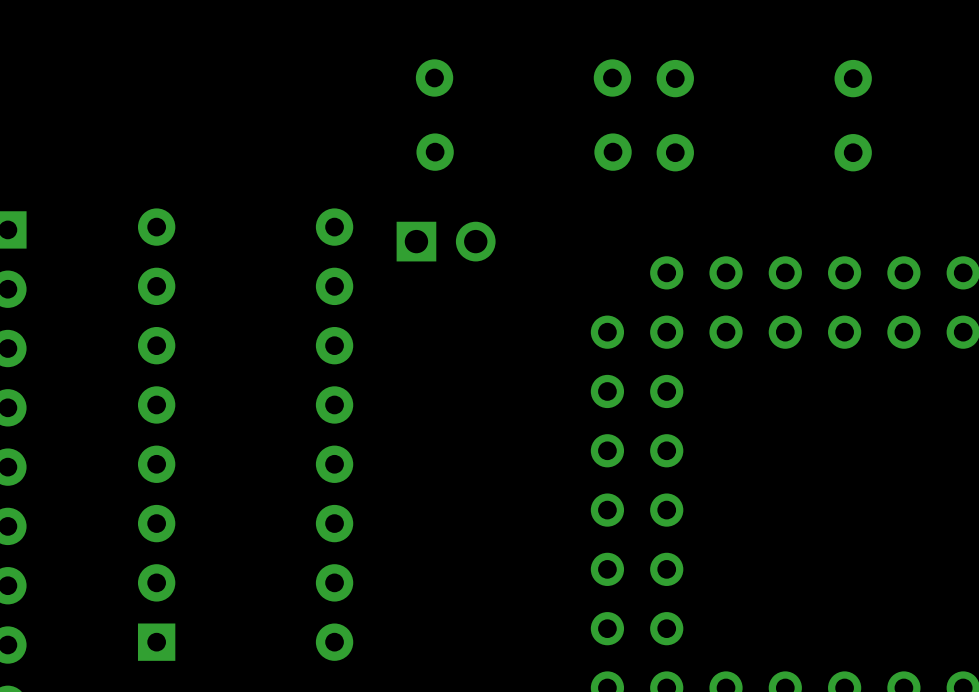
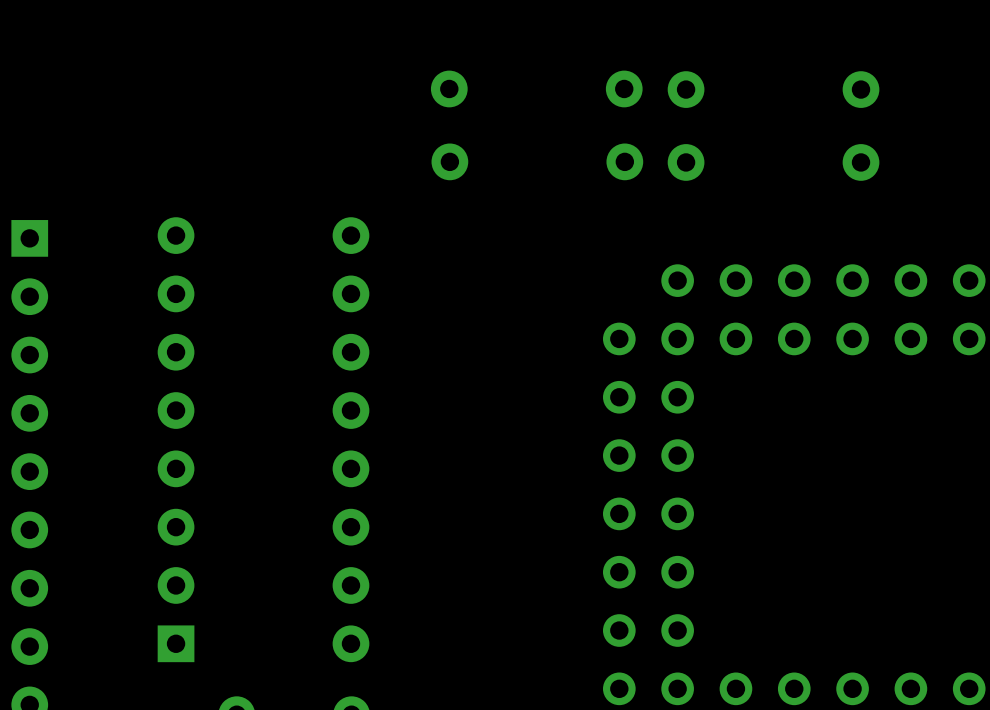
part: (446, 241) -> none

